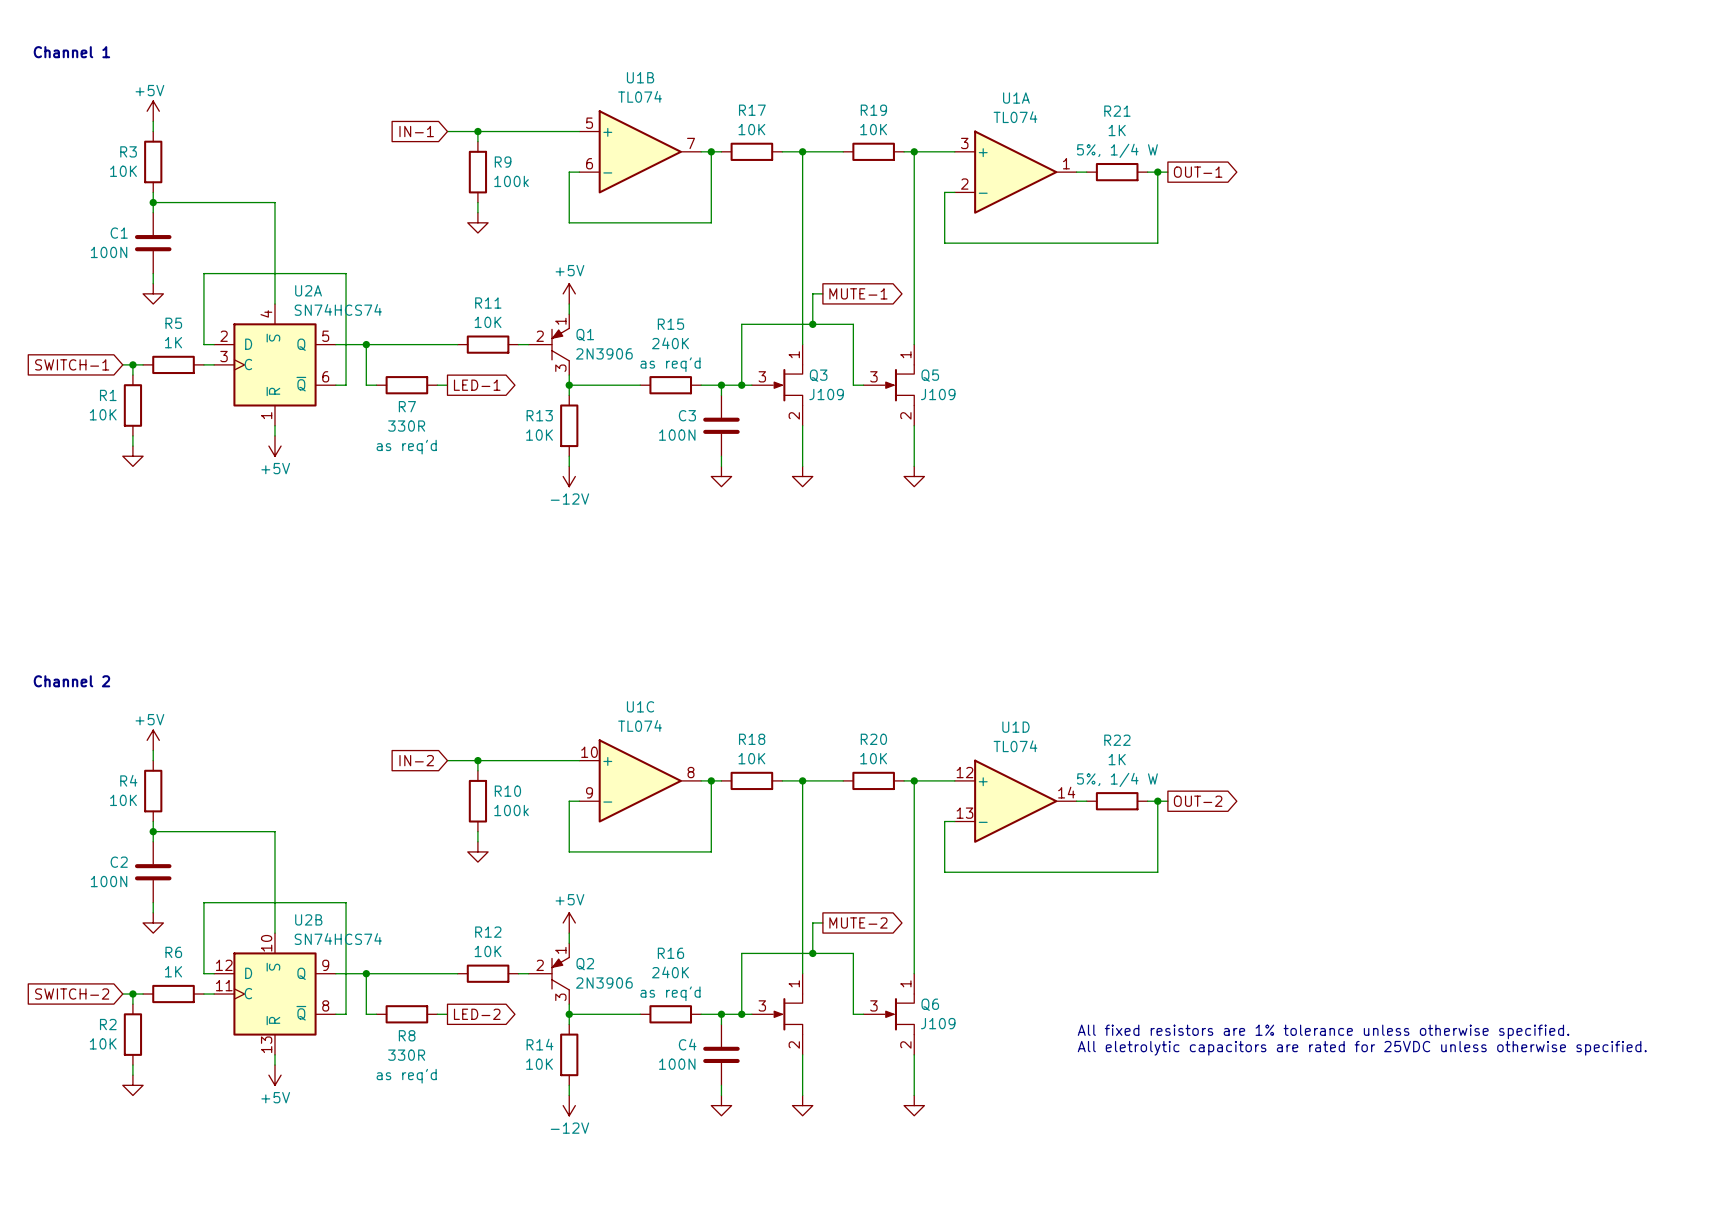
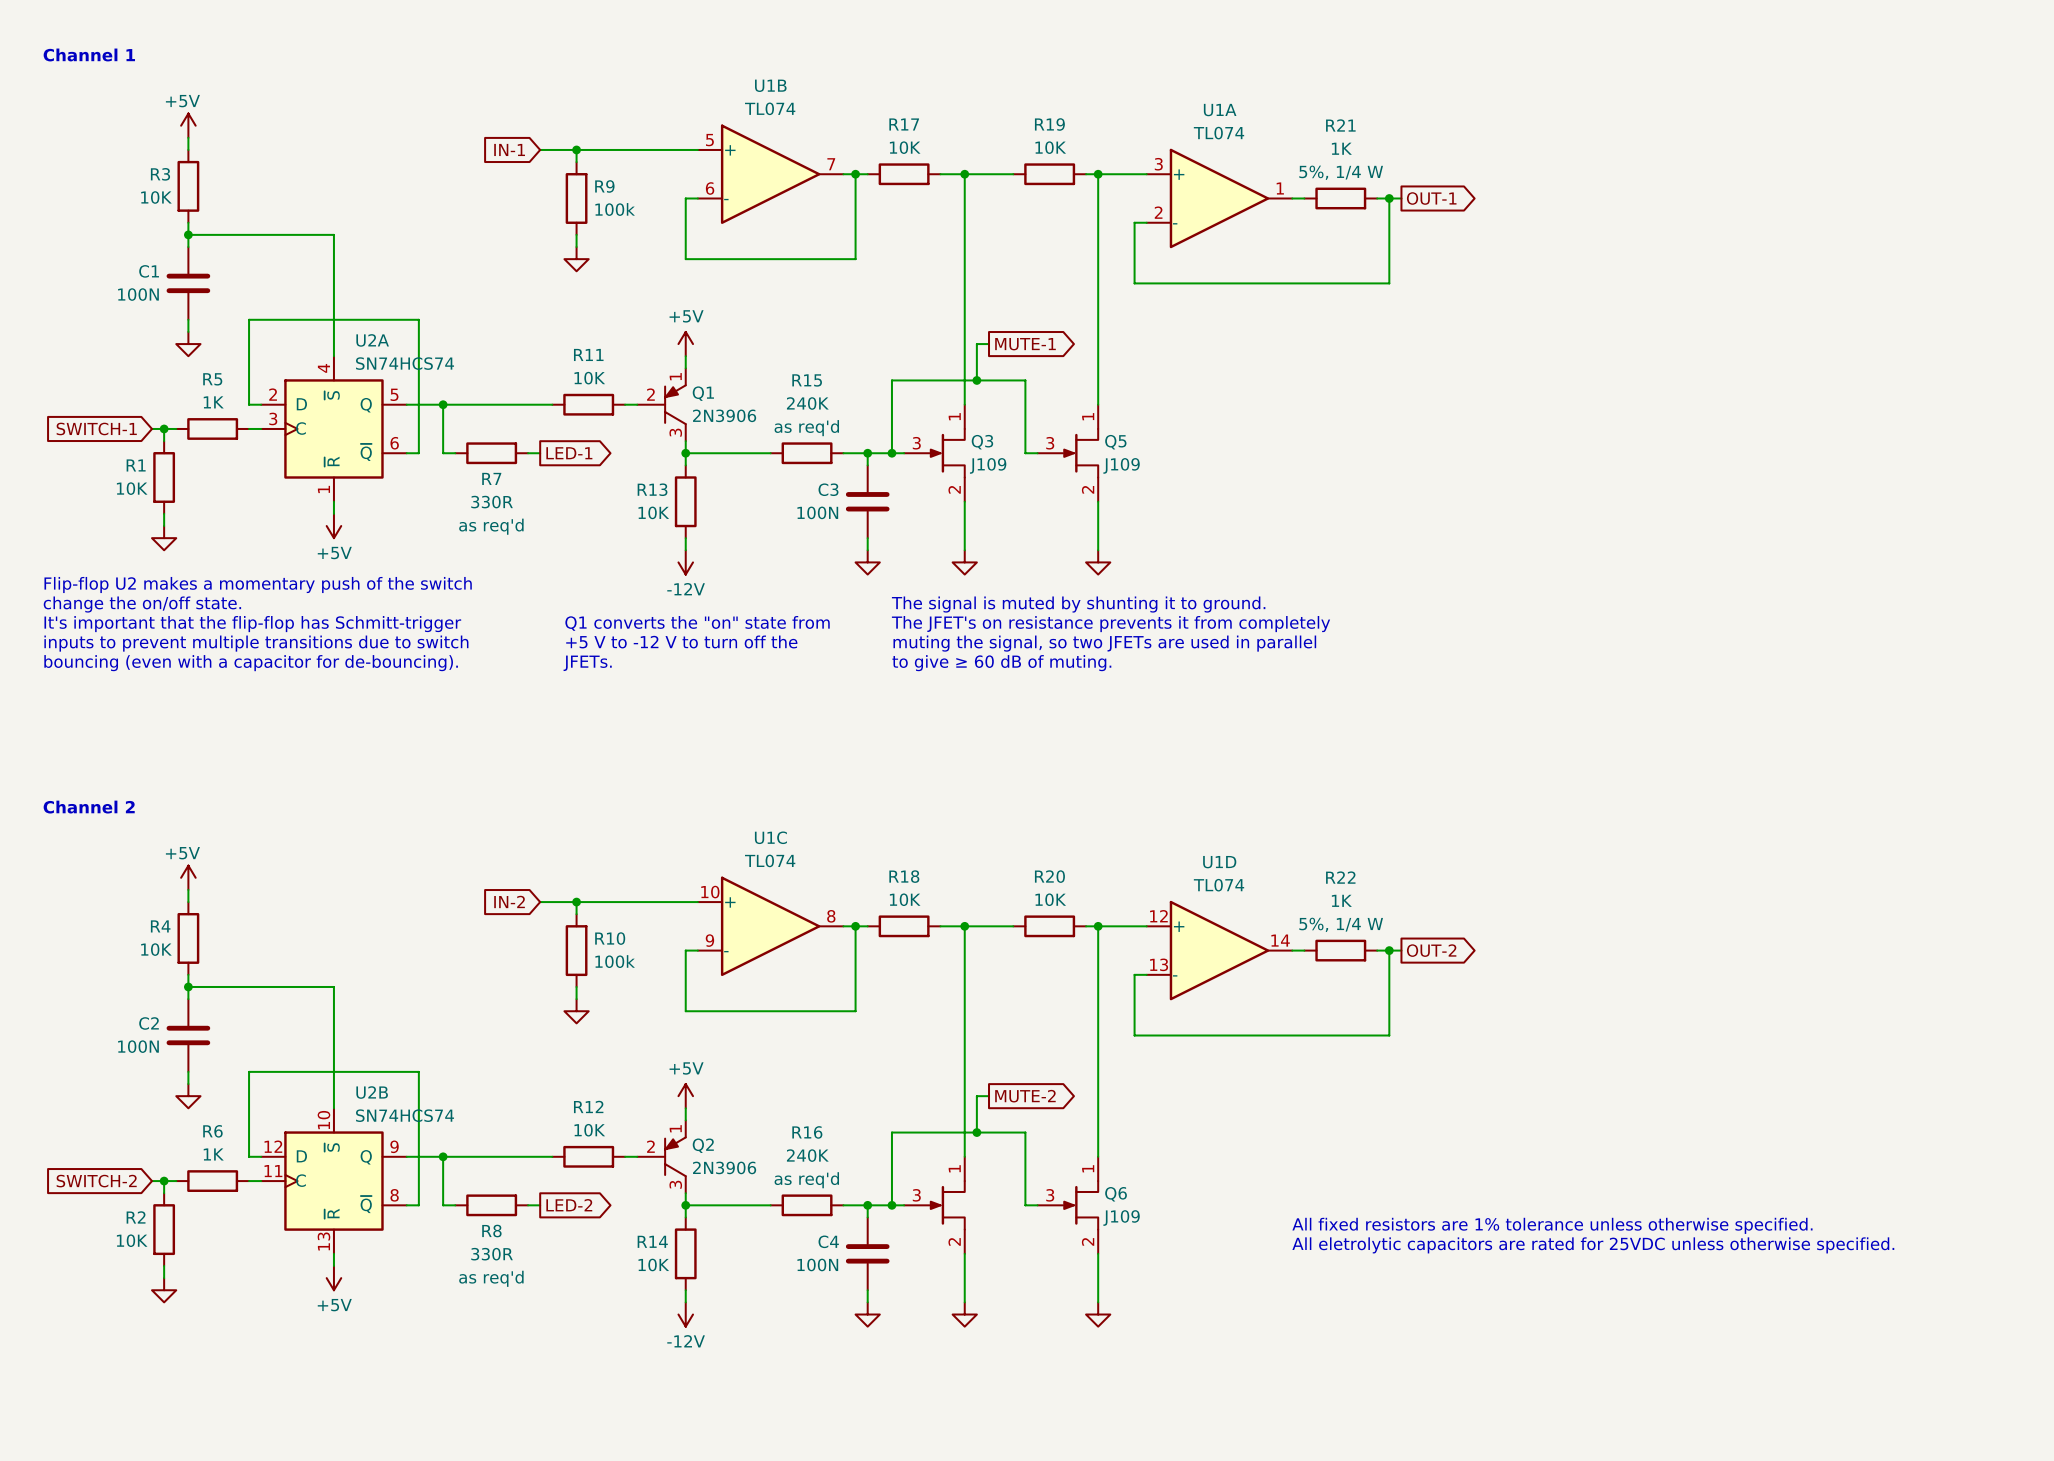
text: none -> Flip-flop U2 makes a momentary push of the switch (258, 585)
text: none -> change the on/off state. (142, 604)
text: none -> The signal is muted by shunting it to ground. (1078, 604)
text: none -> Q1 converts the "on" state from (697, 623)
text: none -> It's important that the flip-flop has Schmitt-trigger (252, 624)
text: none -> The JFET's on resistance prevents it from completely (1111, 624)
text: none -> +5 V to -12 V to turn off the (681, 641)
text: none -> inputs to prevent multiple transitions due to switch (256, 643)
text: none -> muting the signal, so two JFETs are used in parallel (1104, 643)
text: none -> JFETs. (587, 663)
text: none -> bouncing (even with a capacitor for de-bouncing). (251, 663)
text: none -> to give ≥ 60 dB of muting. (1001, 663)

